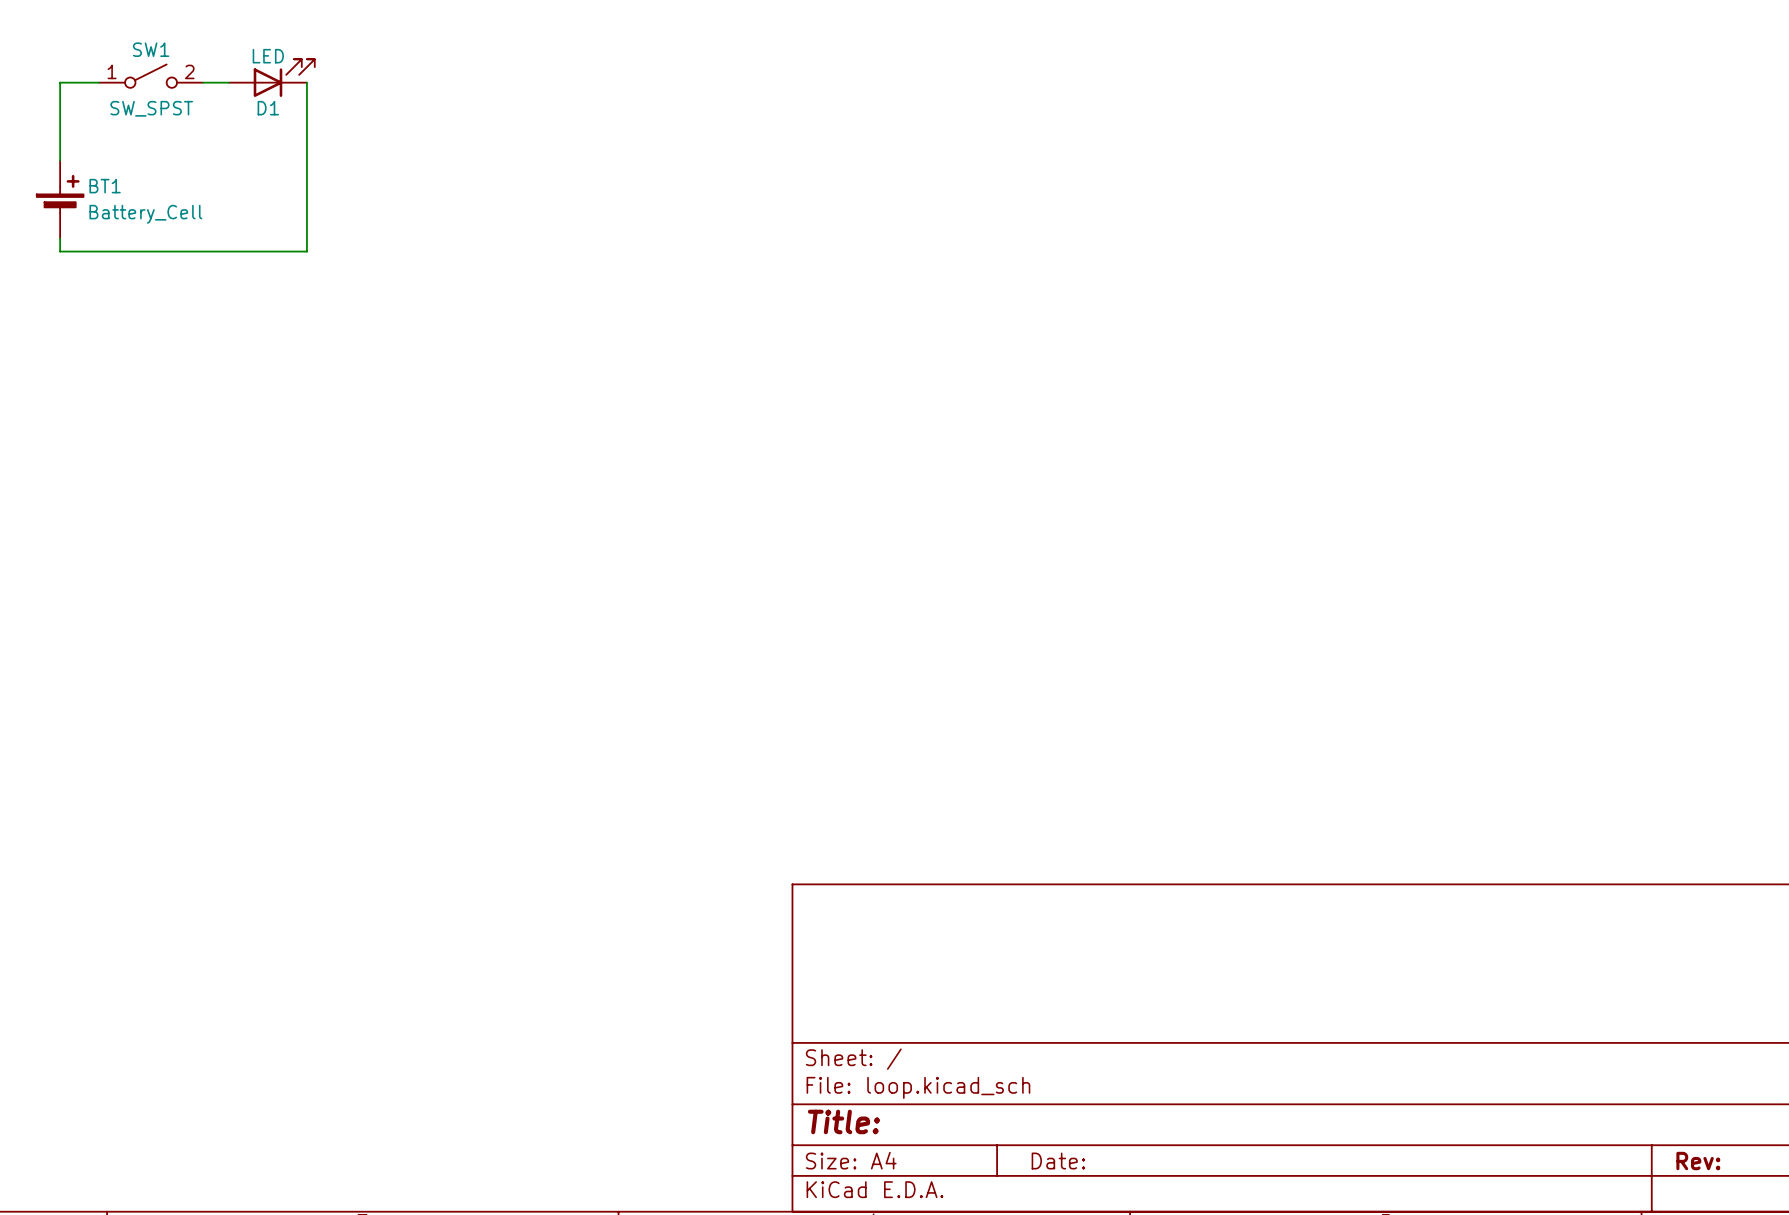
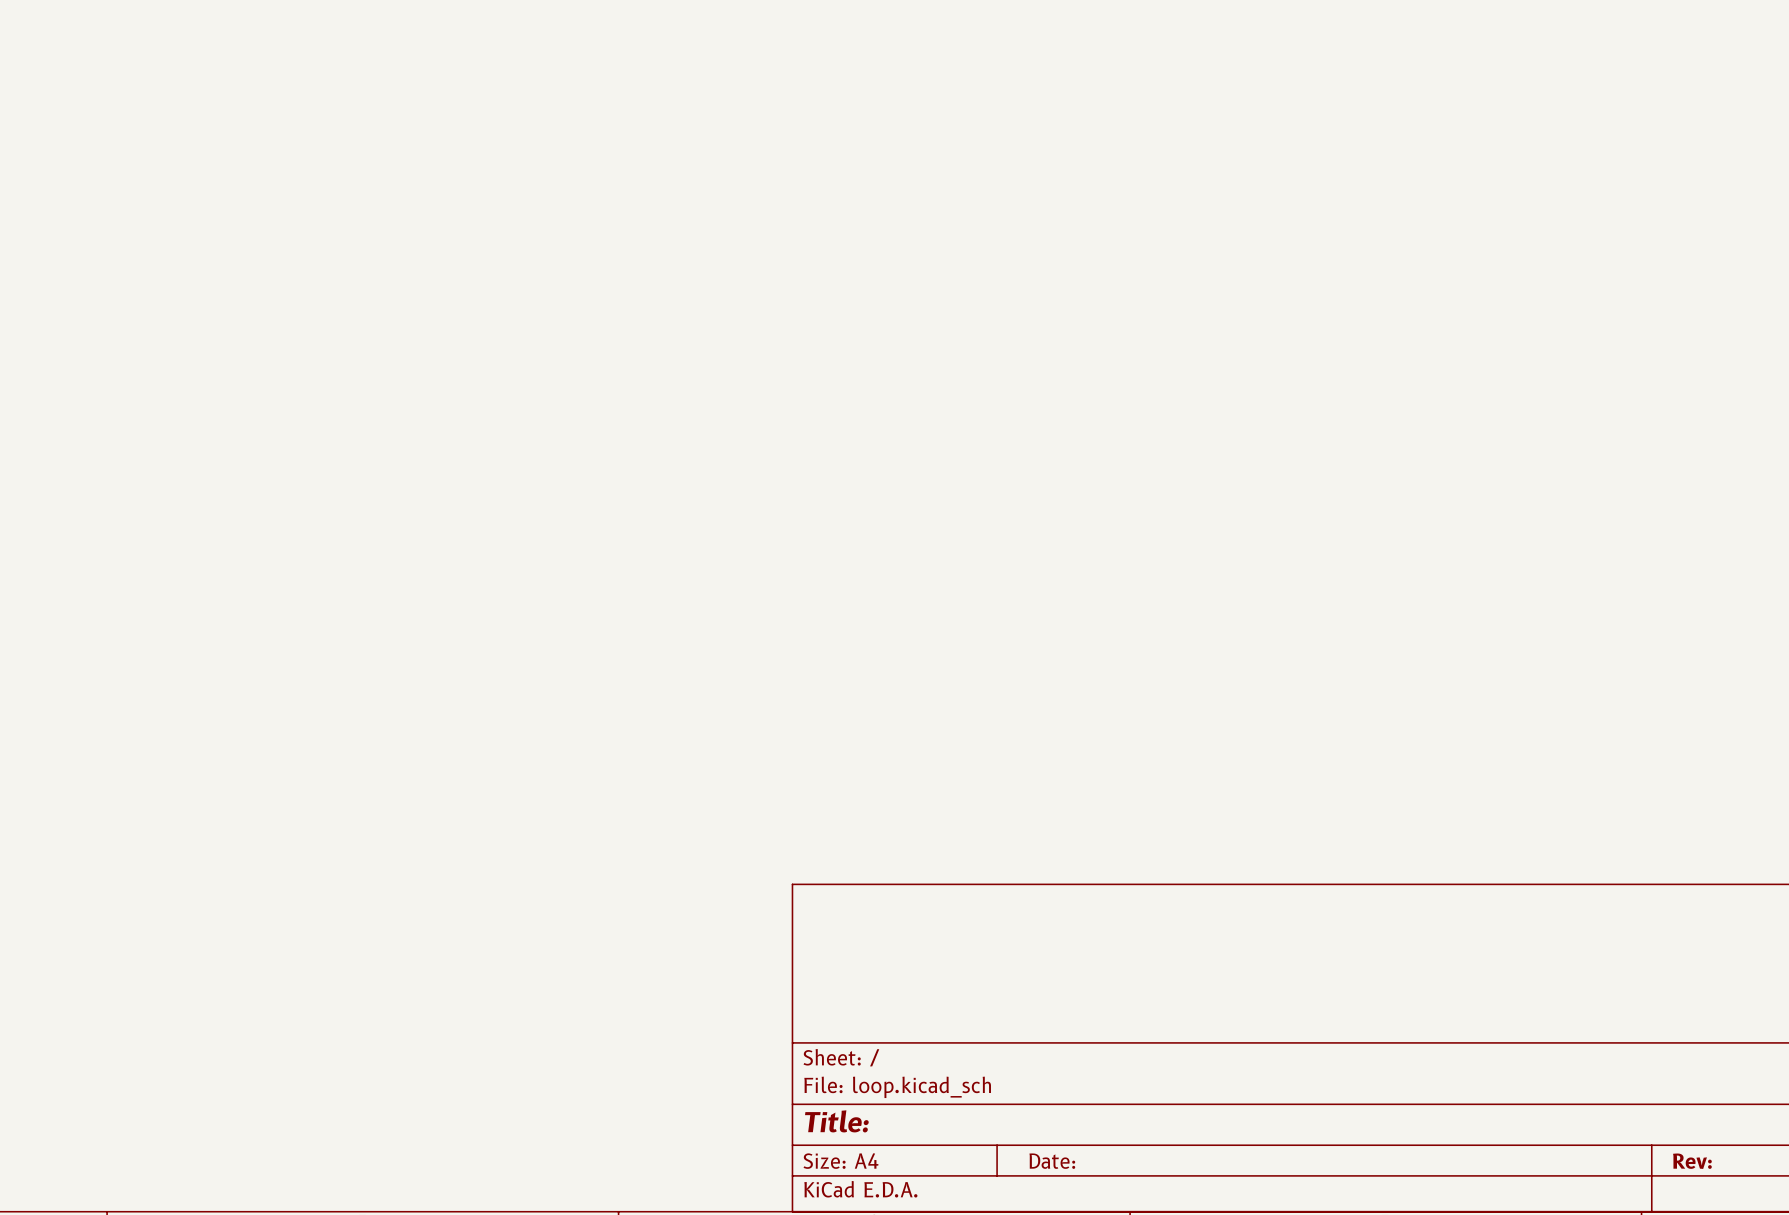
SW1: SW_SPST (151, 76) -> none
D1: LED (271, 78) -> none
wire: (99, 82) (60, 82) (60, 160) -> none
wire: (203, 82) (229, 82) -> none
wire: (306, 82) (306, 251) (60, 251) (60, 238) -> none
BT1: Battery_Cell (60, 199) -> none

